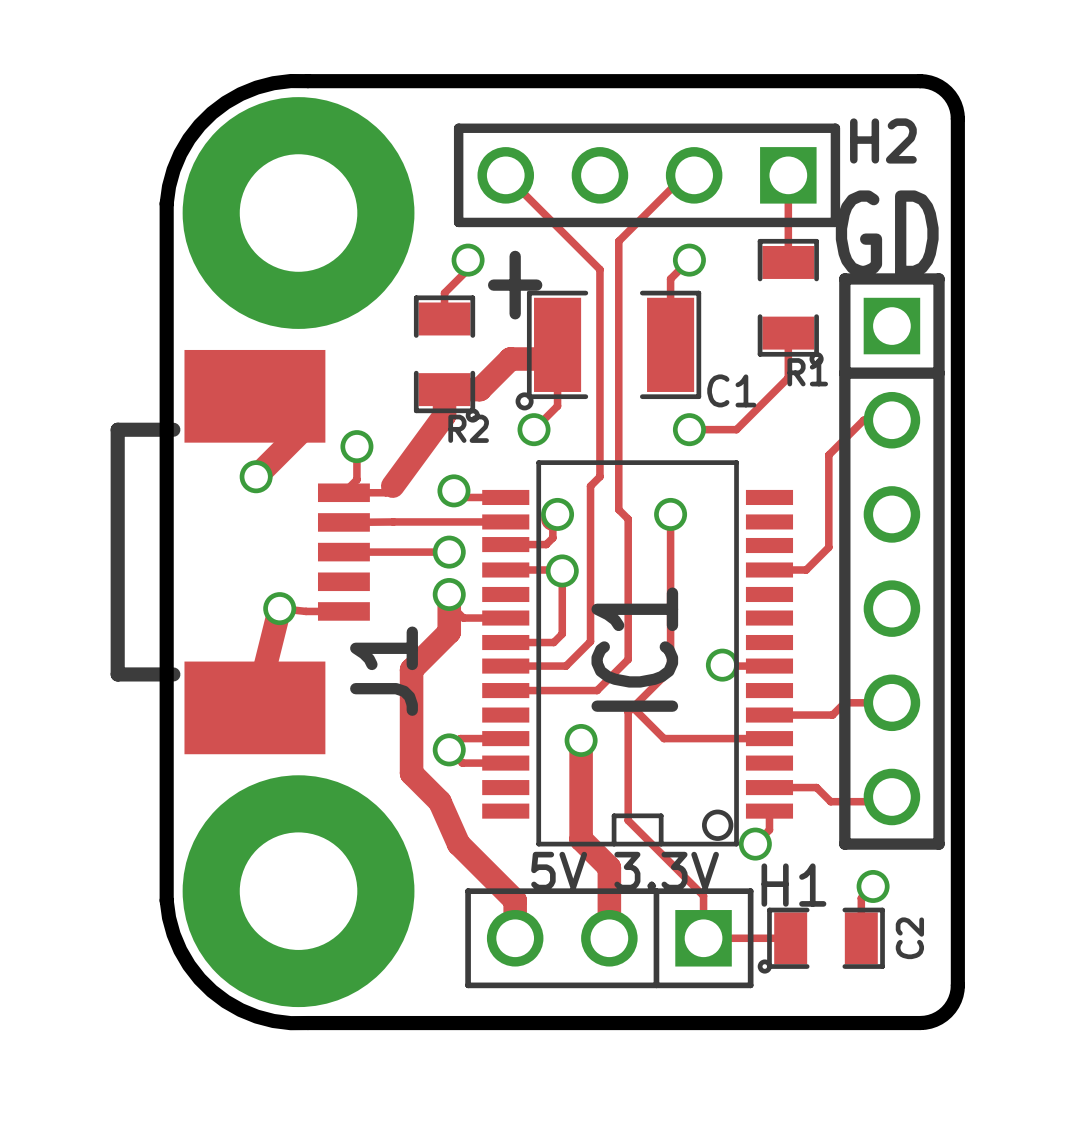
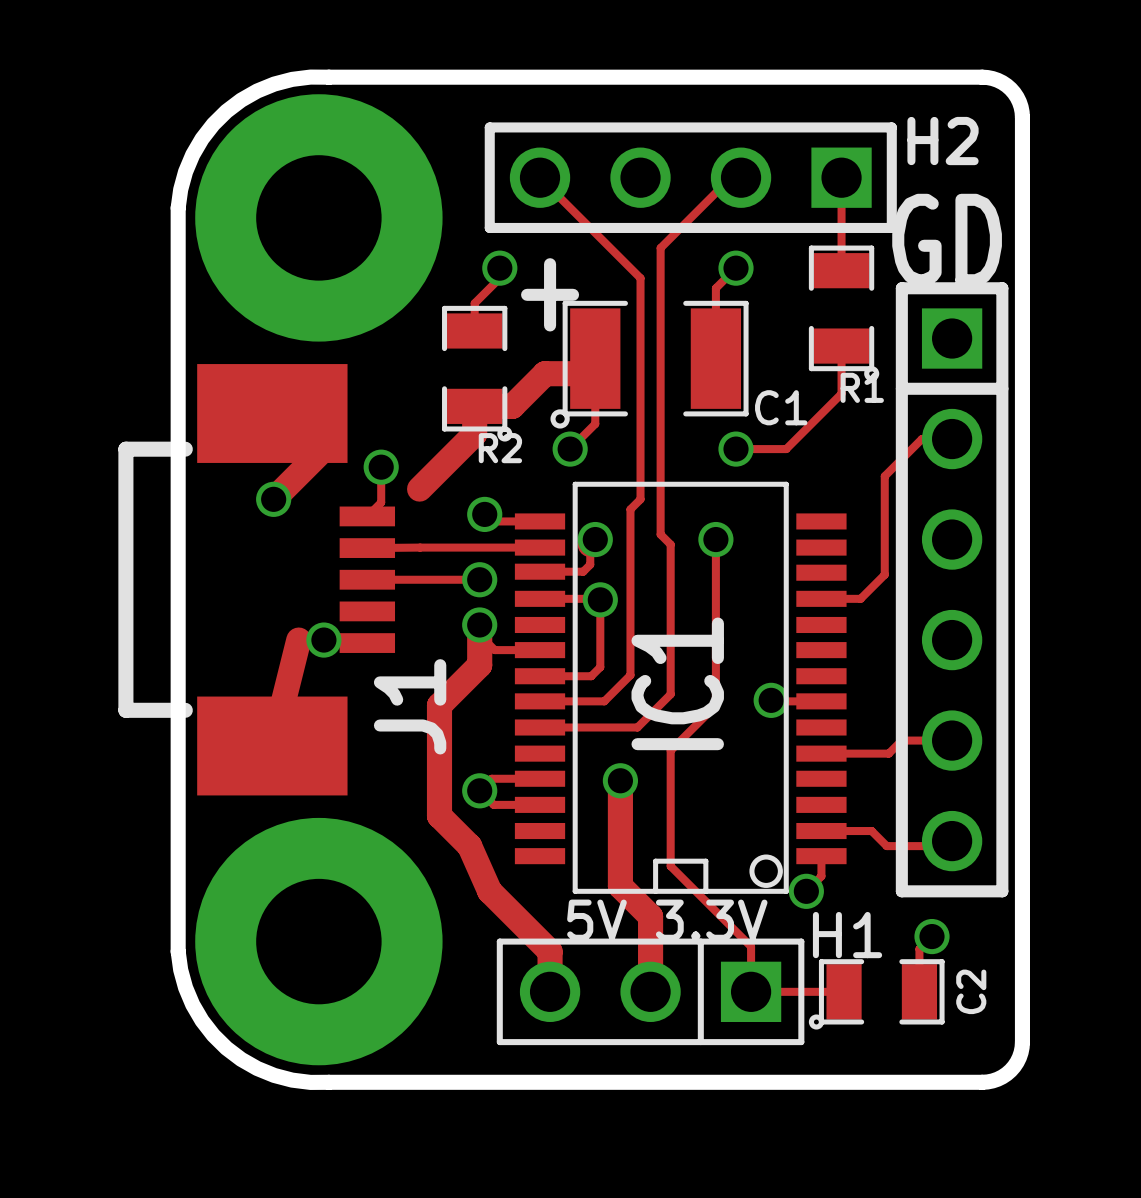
track: (444, 415) (386, 492) (343, 492) -> (474, 434) (419, 489)
via position: (279, 608) -> (323, 640)
track: (632, 707) (663, 738) (769, 738) -> none

